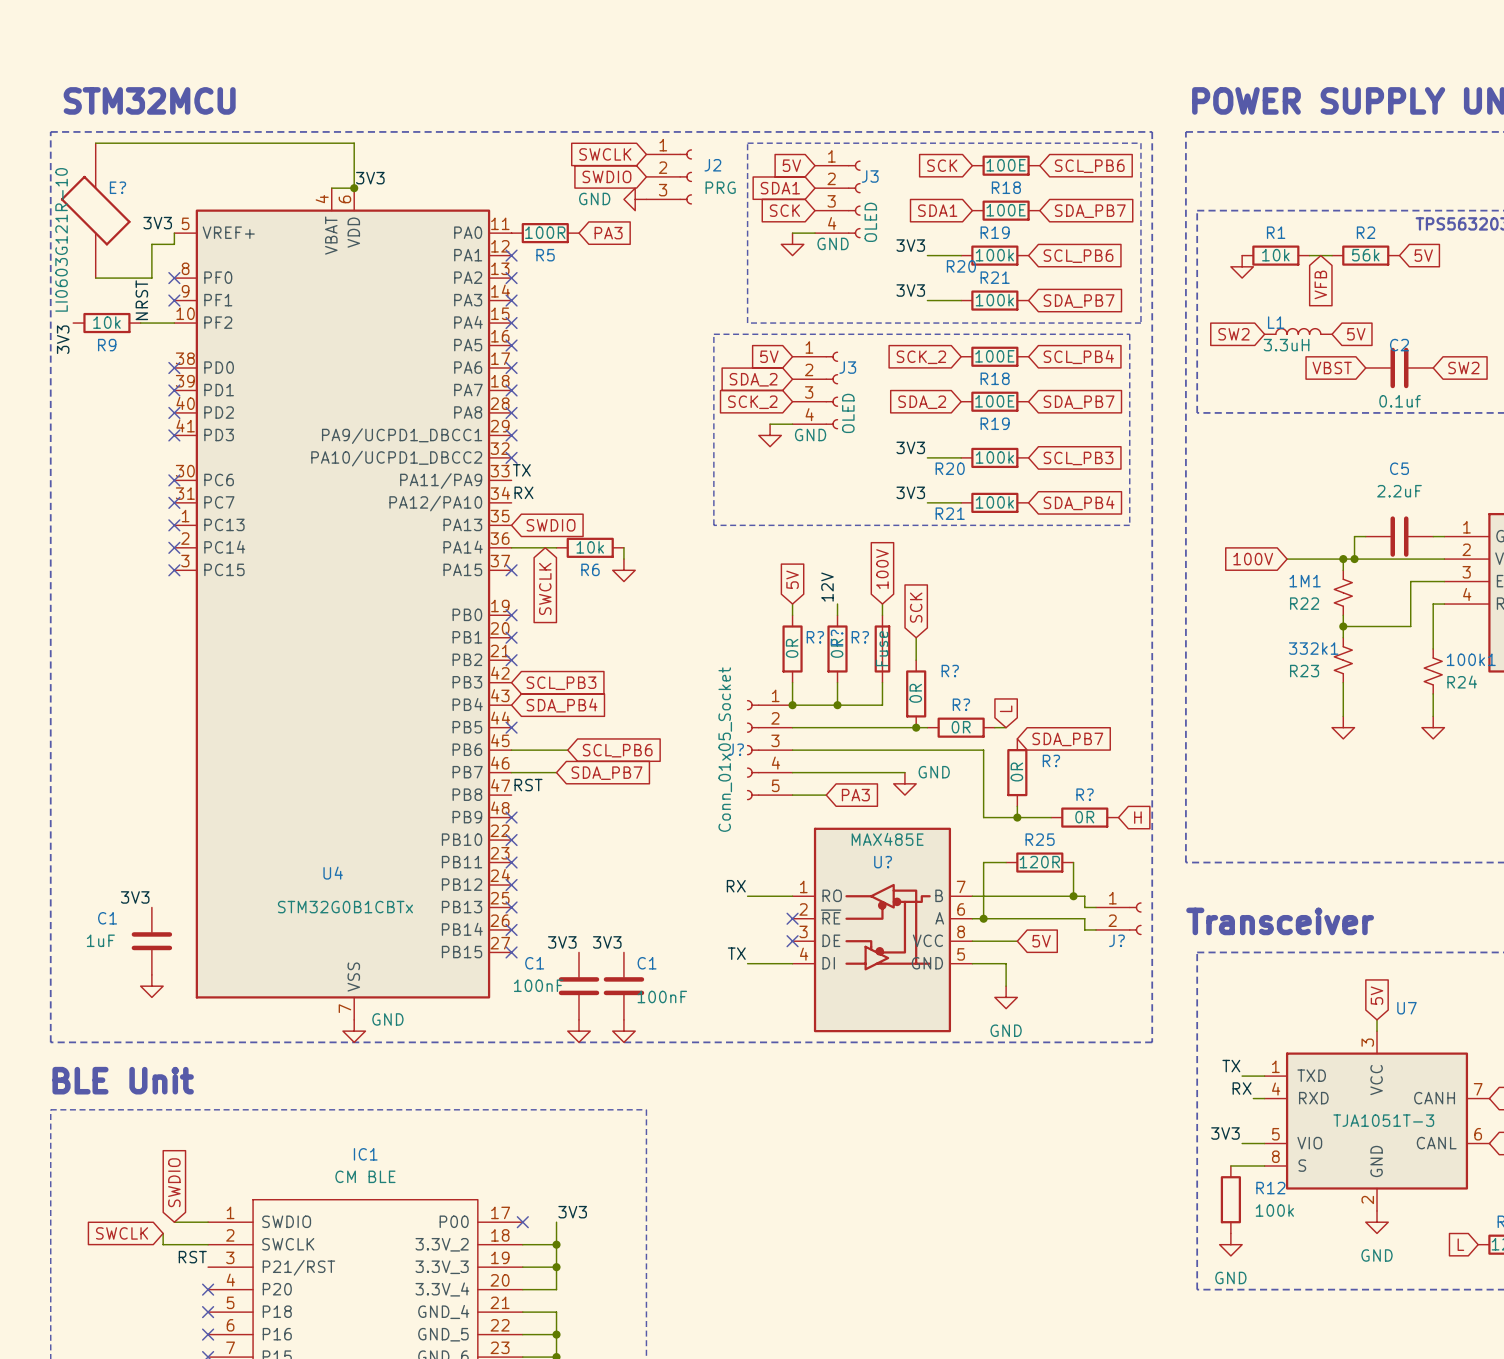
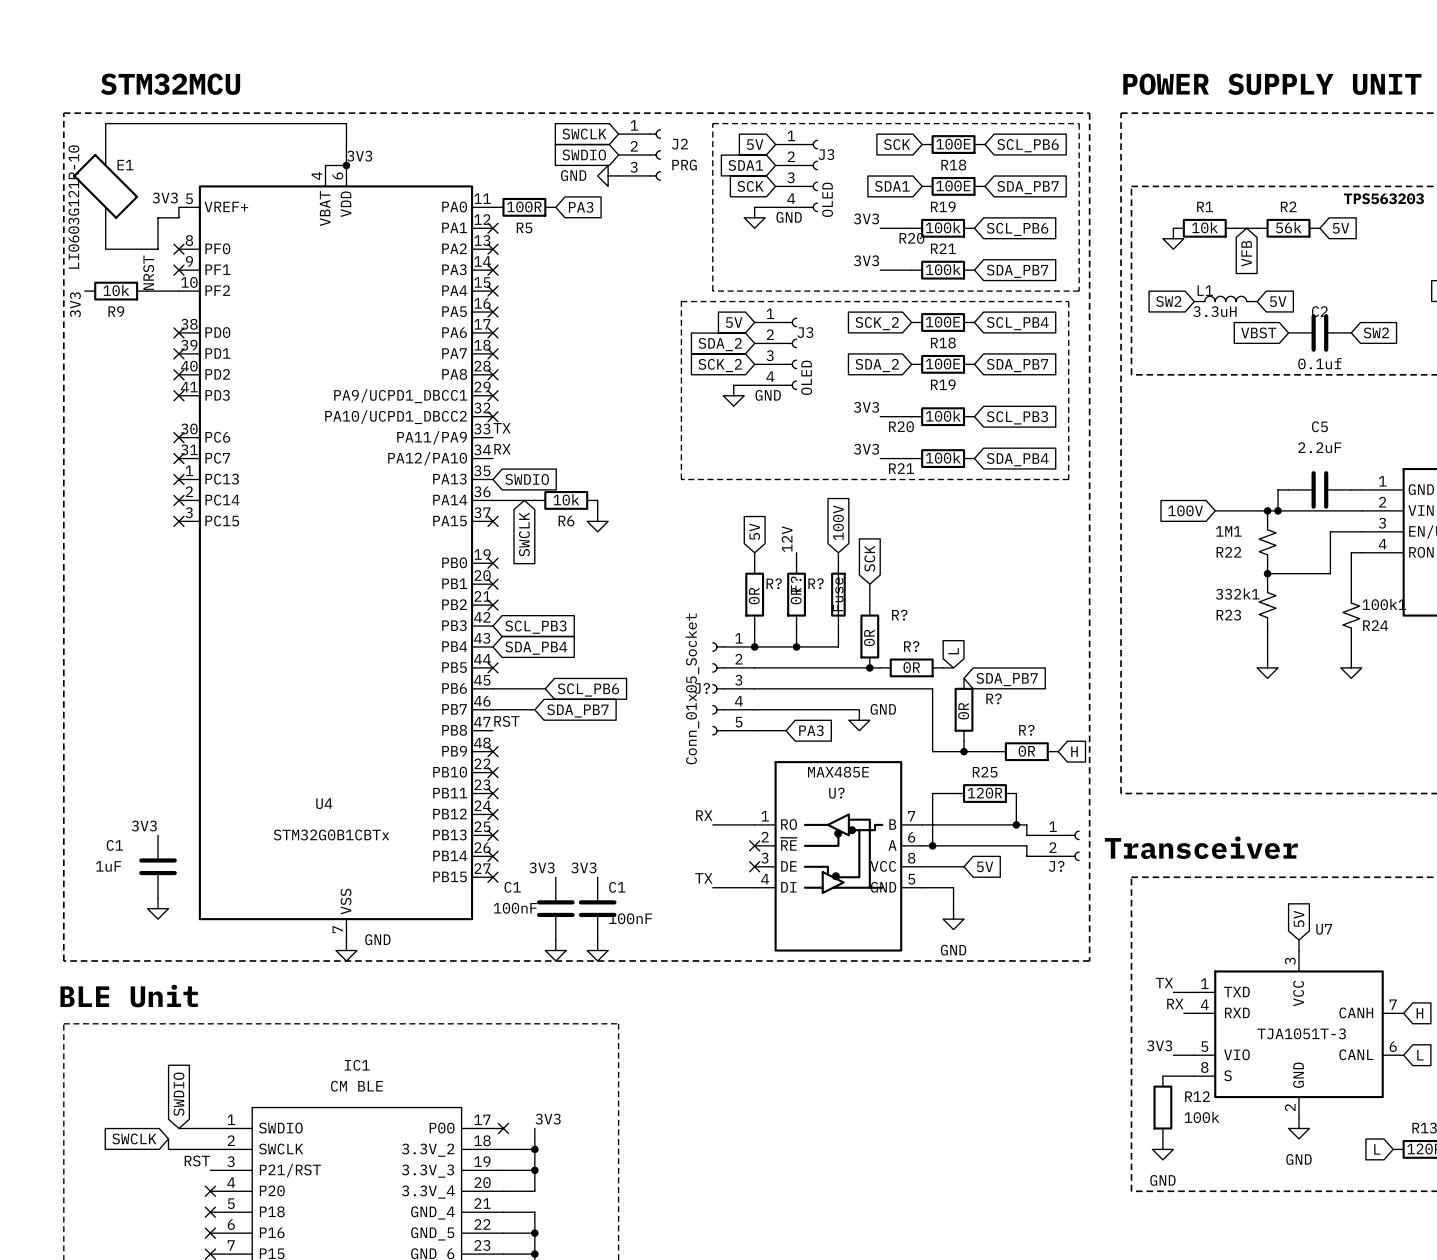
E? name: E? (117, 187) -> E1 (125, 165)

